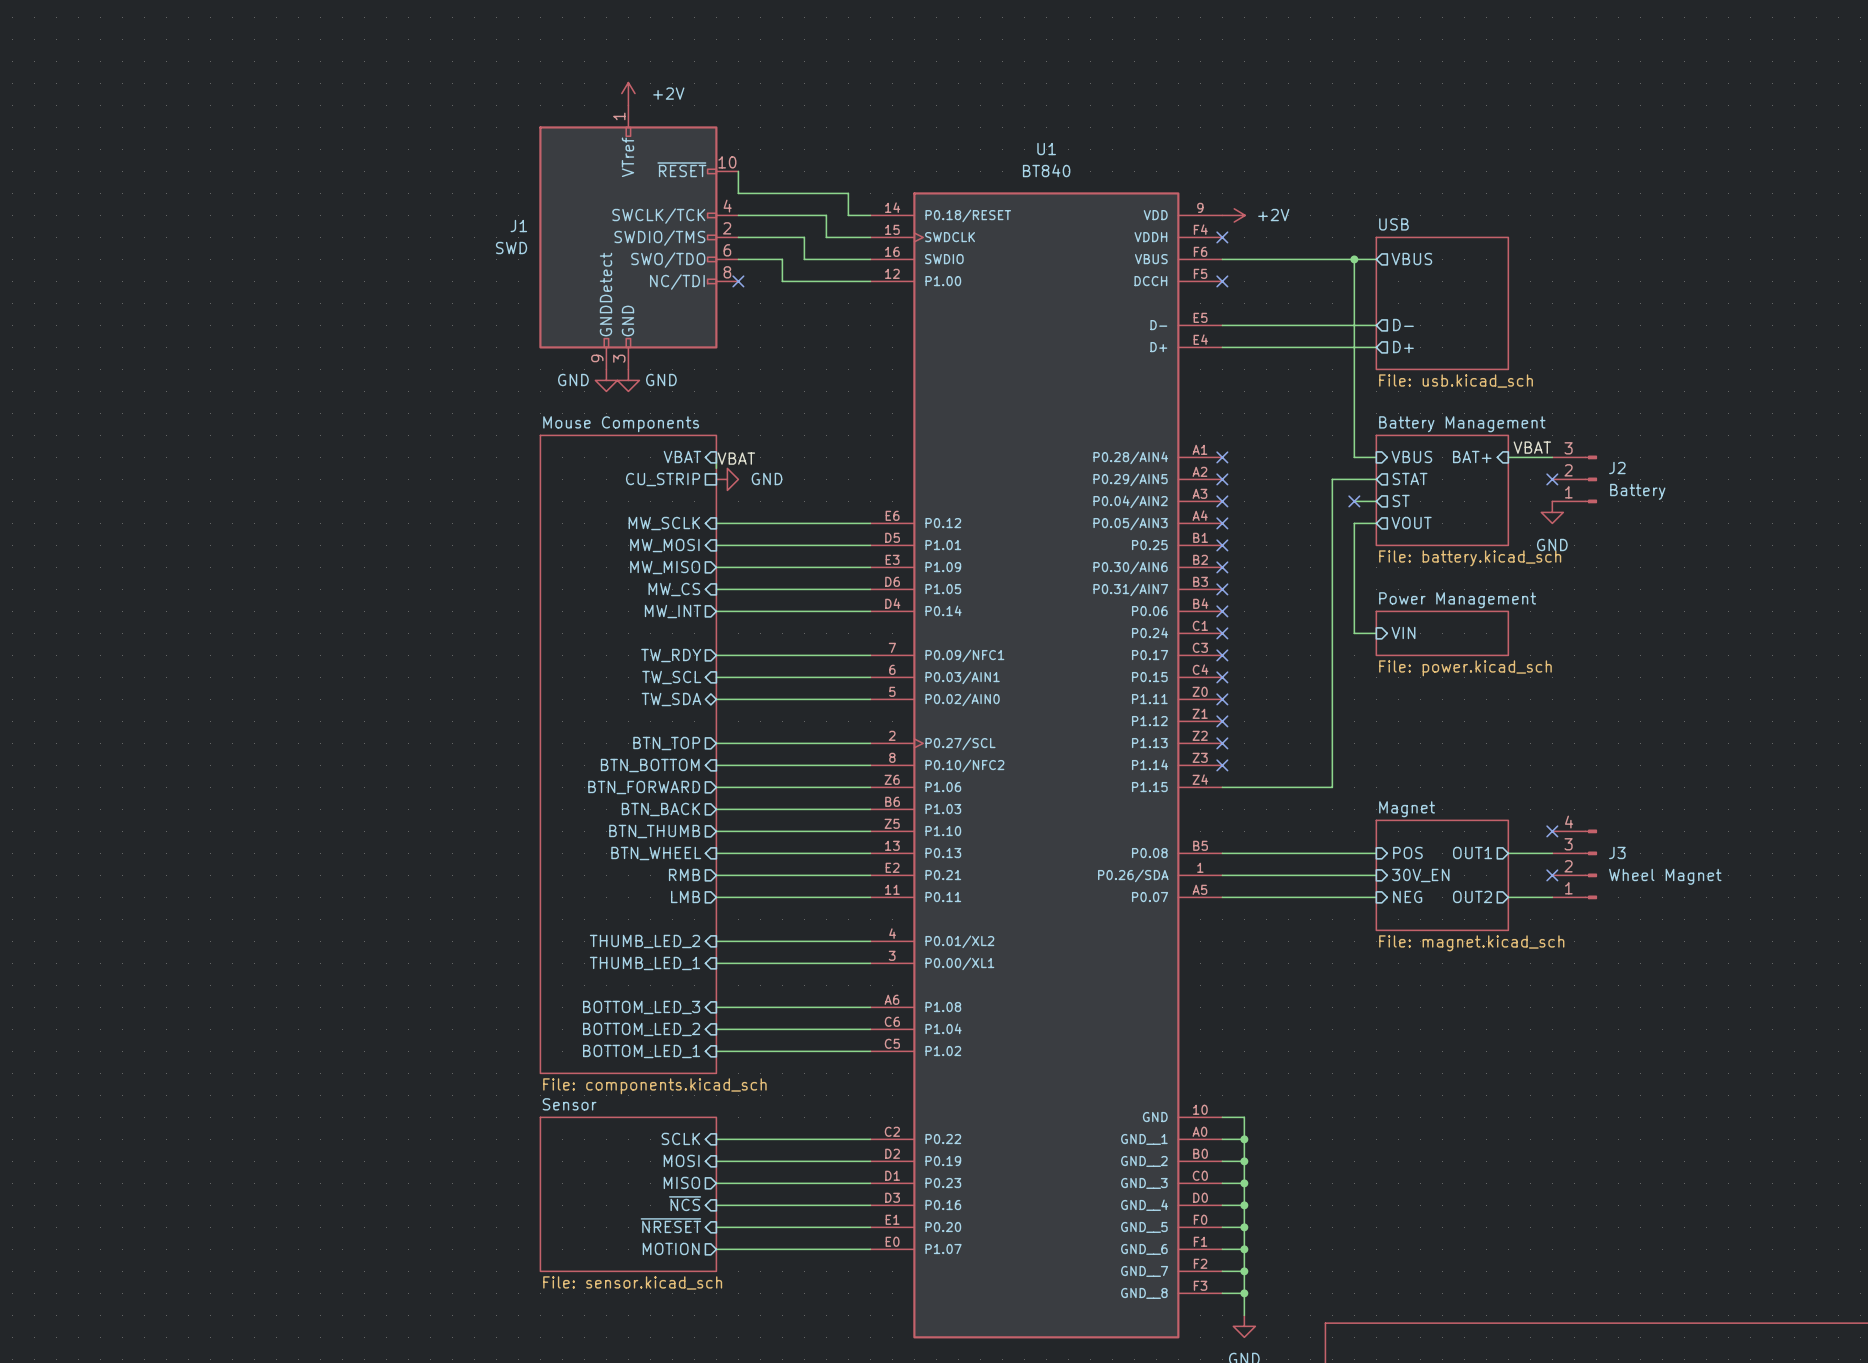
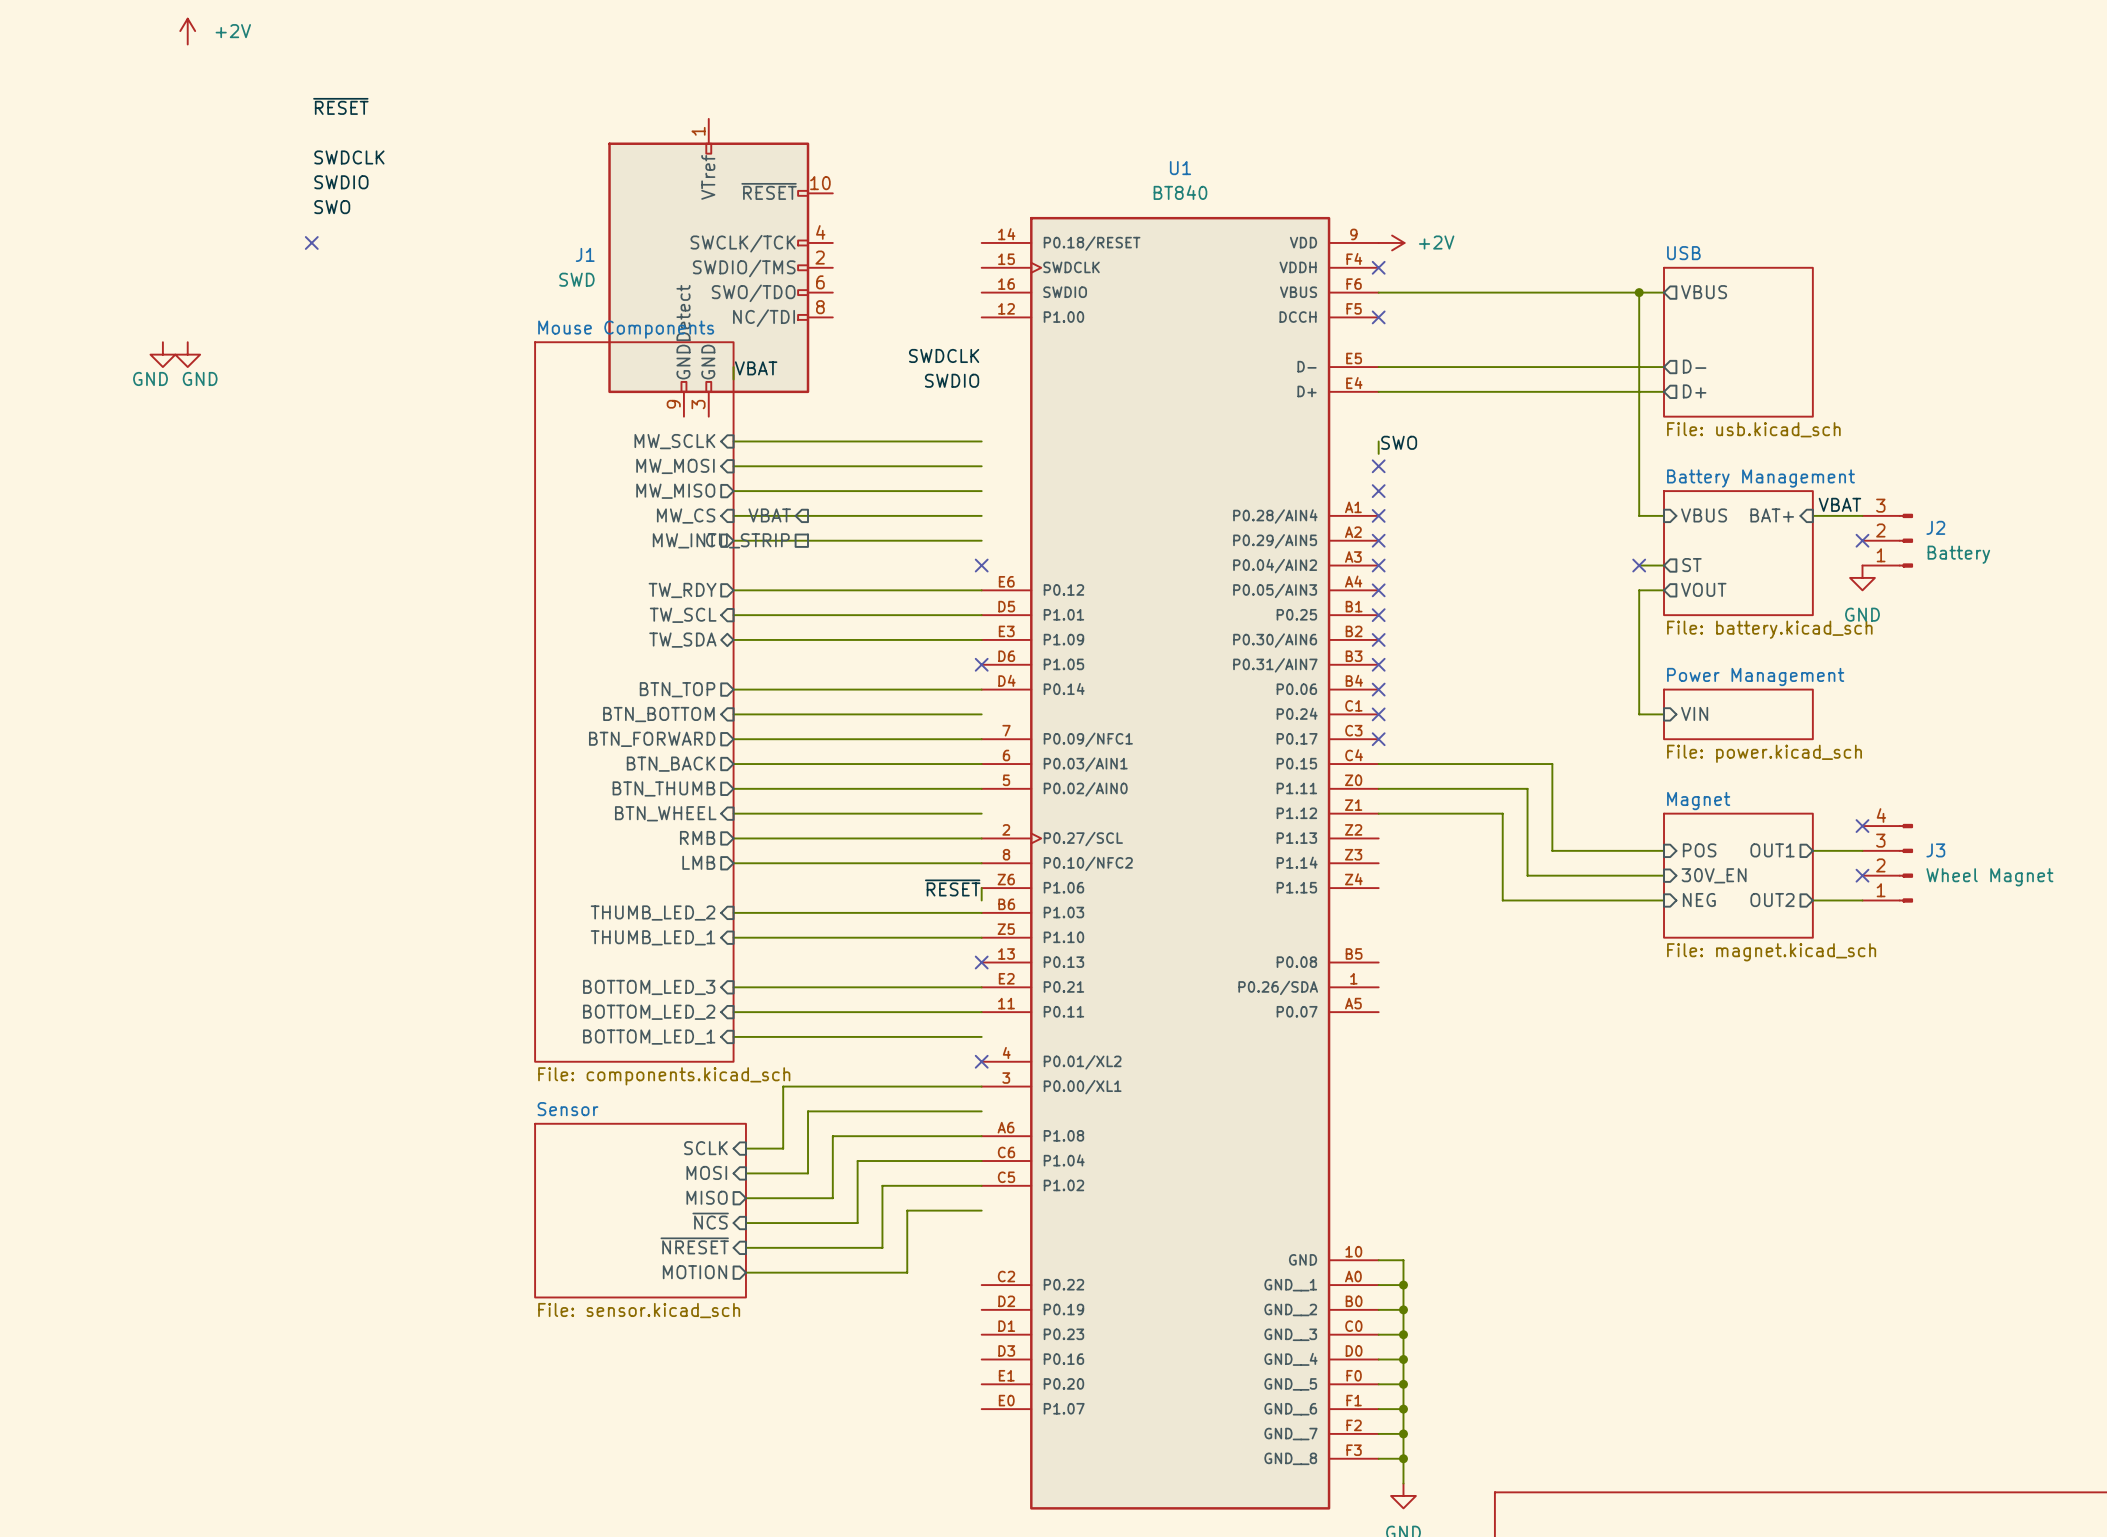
power symbol: none -> +2V (187, 31)
power symbol: +2V (628, 93) -> none
label: none -> ~{RESET} (340, 106)
label: none -> SWDCLK (349, 157)
label: none -> SWDIO (341, 182)
wire: (738, 171) (738, 193) (848, 193) (848, 215) (870, 215) -> none
label: none -> SWO (332, 207)
no-connect mark: none -> (311, 242)
wire: (738, 215) (826, 215) (826, 237) (870, 237) -> none
wire: (738, 237) (804, 237) (804, 259) (870, 259) -> none
wire: (738, 259) (782, 259) (782, 281) (870, 281) -> none
wire: (1354, 259) (1354, 457) (1376, 457) -> (1639, 292) (1639, 515) (1664, 515)
junction: (1354, 259) -> none
wire: none -> (1552, 292) (1664, 292)
sheet pin position: VBUS (1411, 259) -> VBUS (1704, 292)
junction: none -> (1639, 292)
no-connect mark: (738, 281) -> none
sheet USB position: (1442, 303) -> (1738, 342)
power symbol: none -> GND (162, 354)
power symbol: none -> GND (187, 354)
label: none -> SWDCLK (944, 355)
wire: none -> (1552, 367) (1664, 367)
sheet pin position: D- (1403, 325) -> D- (1694, 366)
label: none -> SWDIO (952, 380)
wire: none -> (1552, 391) (1664, 391)
sheet pin position: D+ (1403, 347) -> D+ (1694, 391)
power symbol: GND (606, 380) -> none
power symbol: GND (628, 380) -> none
wire: none -> (733, 441) (981, 441)
wire: none -> (1378, 441) (1378, 453)
label: none -> SWO (1399, 442)
wire: none -> (733, 466) (981, 466)
no-connect mark: none -> (1378, 466)
wire: none -> (733, 491) (981, 491)
no-connect mark: none -> (1378, 491)
label position: VBAT (1532, 447) -> VBAT (1839, 504)
wire: none -> (733, 515) (981, 515)
sheet pin position: VBUS (1411, 457) -> VBUS (1704, 515)
sheet pin position: BAT+ (1472, 457) -> BAT+ (1772, 515)
wire: (1508, 457) (1552, 457) -> (1812, 515) (1862, 515)
label position: VBAT (736, 458) -> VBAT (756, 368)
wire: none -> (733, 540) (981, 540)
power symbol: GND (727, 479) -> none
wire: (1376, 479) (1332, 479) (1332, 721) -> (1378, 813) (1502, 813)
sheet pin: STAT (1410, 479) -> none
no-connect mark: (1552, 479) -> none
J2 position: (1574, 479) -> (1887, 540)
no-connect mark: none -> (1862, 540)
sheet Battery Management position: (1442, 490) -> (1738, 553)
no-connect mark: none -> (981, 565)
wire: (1354, 501) (1376, 501) -> (1639, 565) (1664, 565)
no-connect mark: (1354, 501) -> none
sheet pin position: ST (1401, 501) -> ST (1691, 565)
no-connect mark: none -> (1639, 565)
power symbol position: GND (1552, 512) -> GND (1862, 577)
sheet pin position: VOUT (1411, 522) -> VOUT (1703, 589)
wire: none -> (733, 590) (808, 590)
sheet pin position: MW_SCLK (664, 523) -> MW_SCLK (674, 441)
wire: (1376, 523) (1354, 523) (1354, 633) (1376, 633) -> (1664, 590) (1639, 590) (1639, 714) (1664, 714)
wire: none -> (733, 615) (808, 615)
sheet pin position: MW_MOSI (664, 545) -> MW_MOSI (675, 466)
wire: none -> (733, 639) (808, 639)
sheet pin position: MW_MISO (665, 567) -> MW_MISO (675, 491)
sheet pin position: MW_CS (674, 589) -> MW_CS (686, 516)
wire: (716, 589) (870, 589) -> none
no-connect mark: none -> (981, 664)
wire: none -> (733, 689) (808, 689)
sheet pin position: MW_INT (673, 611) -> MW_INT (684, 540)
sheet pin position: VIN (1403, 632) -> VIN (1694, 713)
wire: none -> (733, 714) (981, 714)
sheet Power Management position: (1442, 633) -> (1738, 714)
wire: none -> (733, 739) (808, 739)
sheet pin position: TW_RDY (671, 655) -> TW_RDY (682, 590)
wire: none -> (733, 764) (808, 764)
sheet pin position: TW_SCL (671, 677) -> TW_SCL (683, 615)
wire: none -> (1378, 764) (1552, 764) (1552, 850) (1664, 850)
no-connect mark: (1222, 677) -> none
wire: none -> (733, 788) (808, 788)
sheet pin position: TW_SDA (671, 699) -> TW_SDA (682, 640)
wire: none -> (1378, 788) (1527, 788) (1527, 875) (1664, 875)
no-connect mark: (1222, 699) -> none
wire: none -> (733, 813) (981, 813)
no-connect mark: (1222, 721) -> none
no-connect mark: none -> (1862, 826)
wire: none -> (733, 838) (808, 838)
sheet pin position: BTN_TOP (666, 743) -> BTN_TOP (677, 689)
no-connect mark: (1222, 743) -> none
sheet Mouse Components position: (628, 754) -> (634, 701)
wire: none -> (733, 863) (808, 863)
sheet pin position: BTN_BOTTOM (650, 765) -> BTN_BOTTOM (658, 714)
no-connect mark: (1222, 765) -> none
no-connect mark: none -> (1862, 875)
sheet pin position: BTN_FORWARD (644, 787) -> BTN_FORWARD (652, 739)
wire: (716, 787) (870, 787) -> (981, 900) (981, 888)
label: none -> ~{RESET} (952, 887)
wire: (1222, 787) (1332, 787) -> (1664, 900) (1502, 900) (1502, 888)
wire: none -> (733, 912) (808, 912)
sheet pin position: BTN_BACK (660, 809) -> BTN_BACK (671, 764)
wire: none -> (733, 937) (808, 937)
sheet pin position: BTN_THUMB (654, 831) -> BTN_THUMB (663, 788)
no-connect mark: (1552, 831) -> none
sheet pin position: POS (1407, 852) -> POS (1699, 850)
sheet pin position: OUT1 (1472, 852) -> OUT1 (1772, 850)
sheet pin position: BTN_WHEEL (656, 853) -> BTN_WHEEL (665, 813)
wire: (716, 853) (870, 853) -> none
no-connect mark: none -> (981, 962)
wire: (1222, 853) (1376, 853) -> none
wire: (1508, 853) (1552, 853) -> (1812, 850) (1862, 850)
J3 position: (1574, 864) -> (1887, 863)
sheet pin position: RMB (684, 874) -> RMB (697, 837)
wire: none -> (733, 987) (808, 987)
wire: (1222, 875) (1376, 875) -> none
sheet pin position: 30V_EN (1420, 875) -> 30V_EN (1714, 875)
sheet Magnet position: (1442, 875) -> (1738, 875)
no-connect mark: (1552, 875) -> none
sheet pin position: LMB (685, 896) -> LMB (698, 862)
sheet pin position: NEG (1407, 896) -> NEG (1699, 900)
sheet pin position: OUT2 (1472, 896) -> OUT2 (1772, 900)
wire: none -> (733, 1012) (808, 1012)
wire: (1222, 897) (1376, 897) -> none
wire: (1508, 897) (1552, 897) -> (1812, 900) (1862, 900)
wire: none -> (733, 1036) (981, 1036)
sheet pin position: THUMB_LED_2 (644, 941) -> THUMB_LED_2 (653, 913)
wire: (716, 941) (870, 941) -> none
no-connect mark: none -> (981, 1061)
sheet pin position: THUMB_LED_1 (644, 963) -> THUMB_LED_1 (653, 937)
wire: none -> (808, 1086) (783, 1086) (783, 1148) (745, 1148)
wire: none -> (981, 1111) (808, 1111) (808, 1173) (745, 1173)
sheet pin position: BOTTOM_LED_3 (641, 1007) -> BOTTOM_LED_3 (649, 987)
wire: (716, 1007) (738, 1007) -> (745, 1198) (832, 1198) (832, 1136)
sheet pin position: BOTTOM_LED_2 (641, 1029) -> BOTTOM_LED_2 (649, 1012)
wire: (716, 1029) (760, 1029) -> (745, 1223) (857, 1223) (857, 1161)
sheet pin position: BOTTOM_LED_1 (641, 1051) -> BOTTOM_LED_1 (649, 1037)
wire: (716, 1051) (782, 1051) -> (745, 1247) (882, 1247) (882, 1185)
sheet Sensor: none -> File: sensor.kicad_sch (640, 1210)
wire: none -> (981, 1210) (907, 1210) (907, 1272) (745, 1272)
sheet pin position: SCLK (680, 1138) -> SCLK (705, 1148)
wire: (716, 1139) (870, 1139) -> none
sheet pin position: MOSI (681, 1160) -> MOSI (706, 1172)
wire: (716, 1161) (870, 1161) -> none
sheet pin position: MISO (681, 1182) -> MISO (707, 1197)
wire: (716, 1183) (870, 1183) -> none
sheet Sensor: File: sensor.kicad_sch (628, 1194) -> none
sheet pin position: ~{NCS} (685, 1203) -> ~{NCS} (710, 1221)
wire: (716, 1205) (870, 1205) -> none
sheet pin position: ~{NRESET} (670, 1225) -> ~{NRESET} (694, 1245)
wire: (716, 1227) (870, 1227) -> none
sheet pin position: MOTION (671, 1248) -> MOTION (694, 1272)
wire: (716, 1249) (870, 1249) -> none

